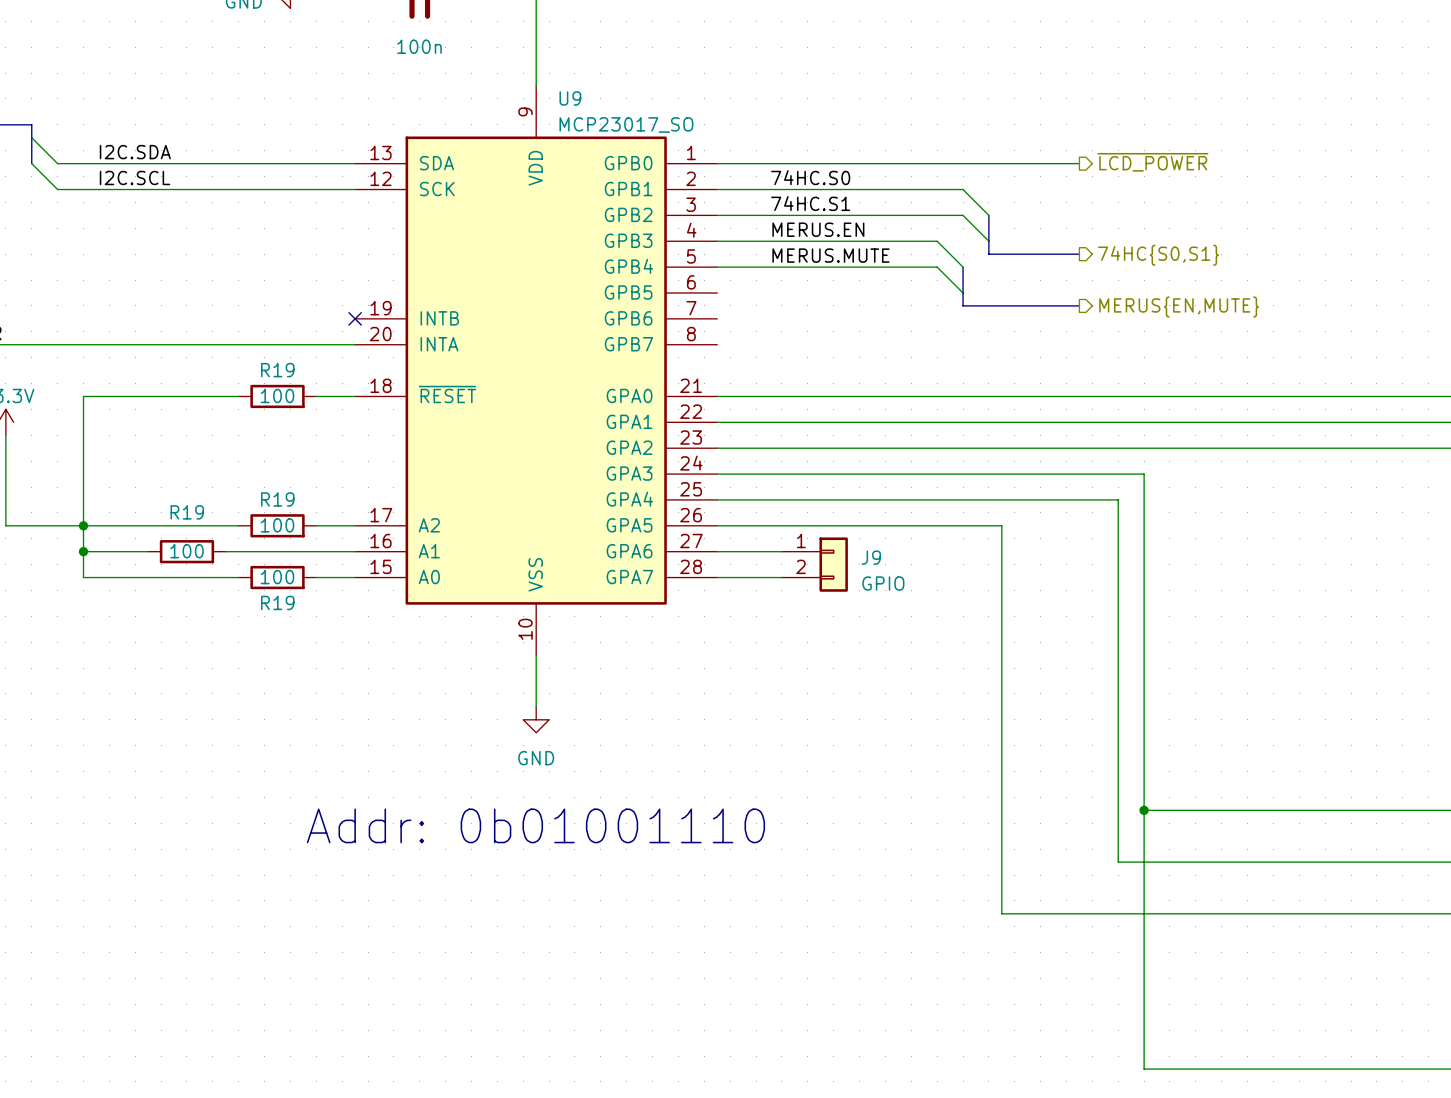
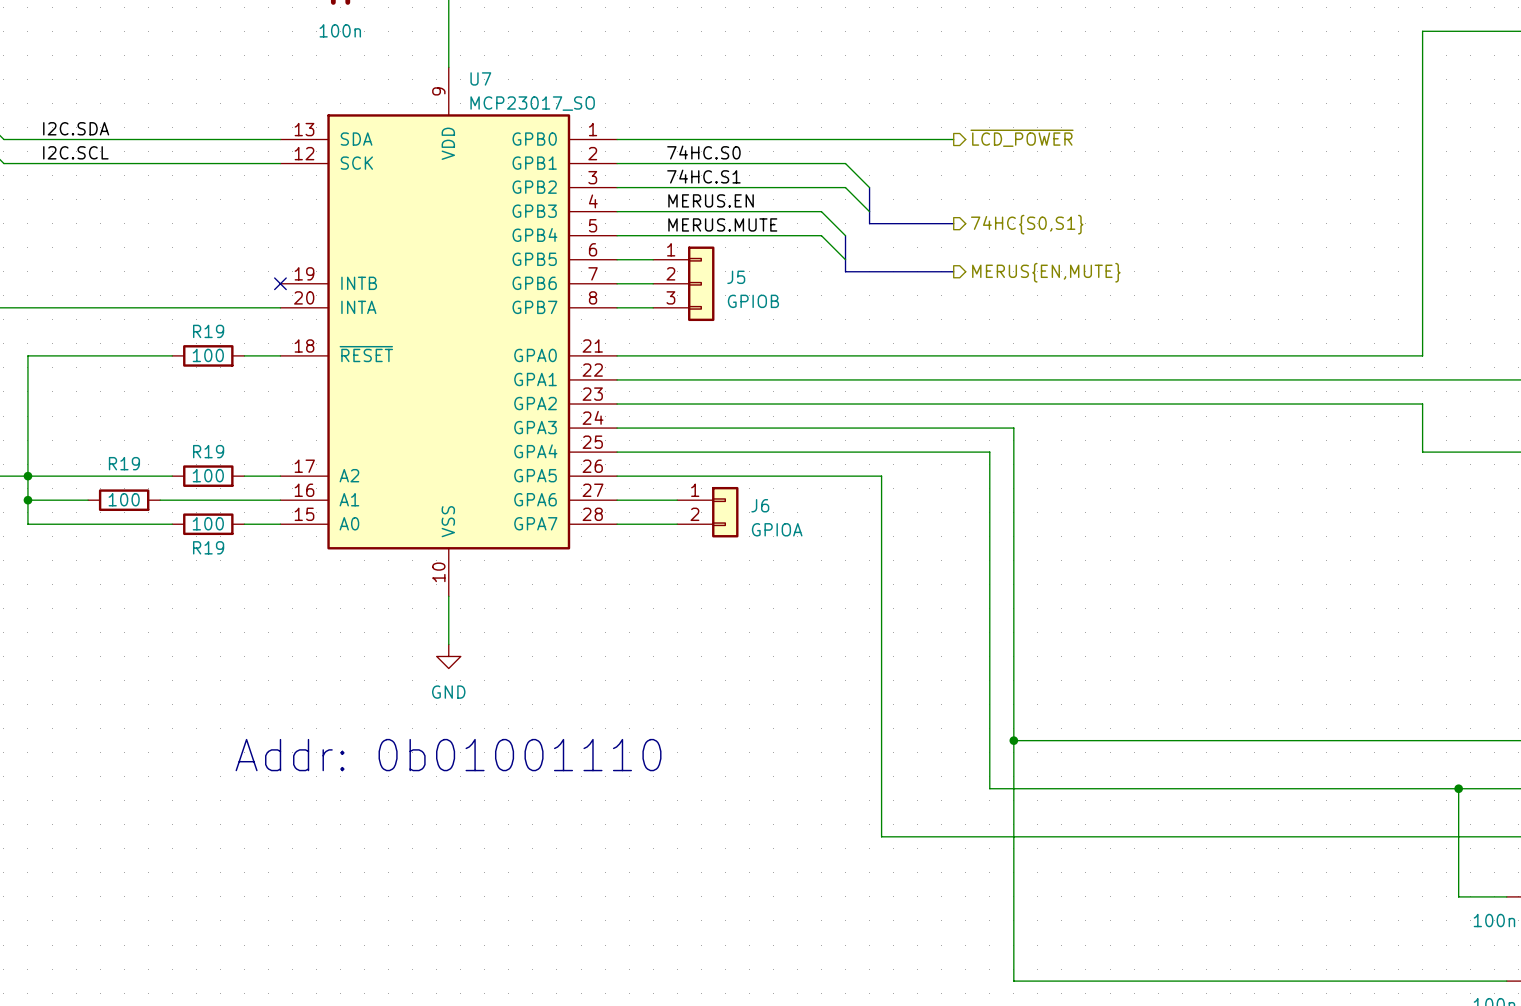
U9 name: U9 (570, 98) -> U7 (480, 78)
wire: none -> (617, 259) (653, 259)
wire: none -> (617, 283) (653, 283)
J5: none -> GPIOB (683, 283)
wire: none -> (617, 307) (653, 307)
J9 name: J9 (871, 557) -> J6 (760, 505)
J9 value: GPIO (883, 583) -> GPIOA (777, 529)

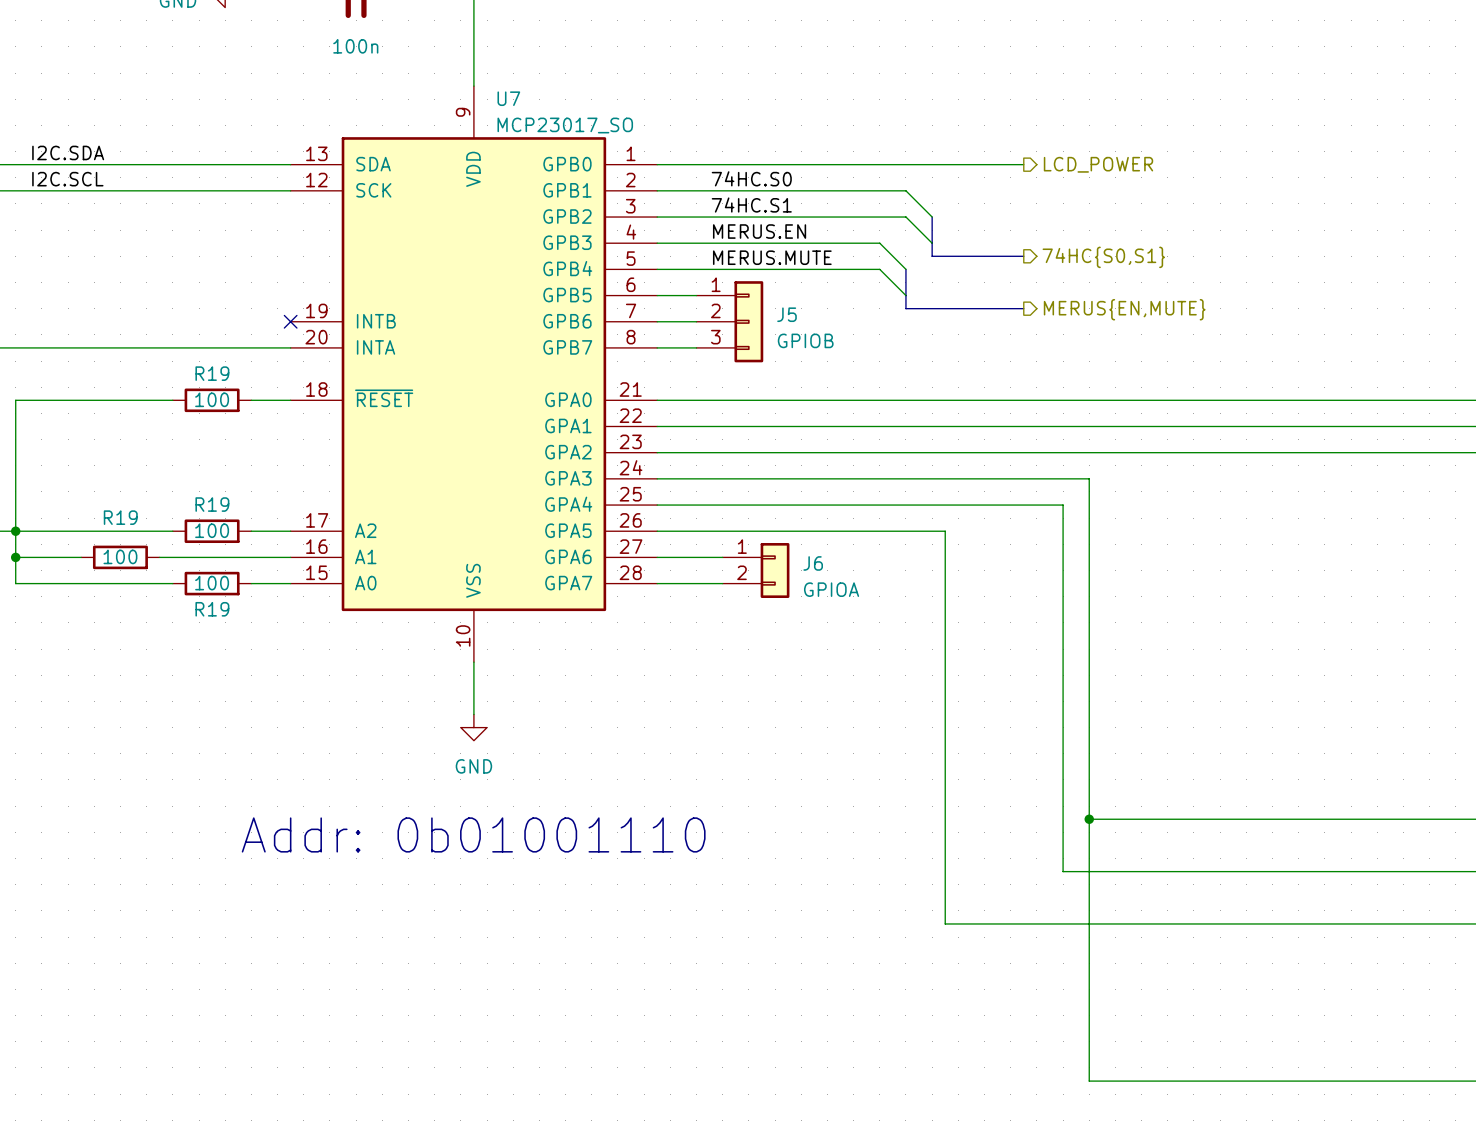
hierarchical label: ~{LCD_POWER} (1022, 138) -> LCD_POWER (1098, 164)

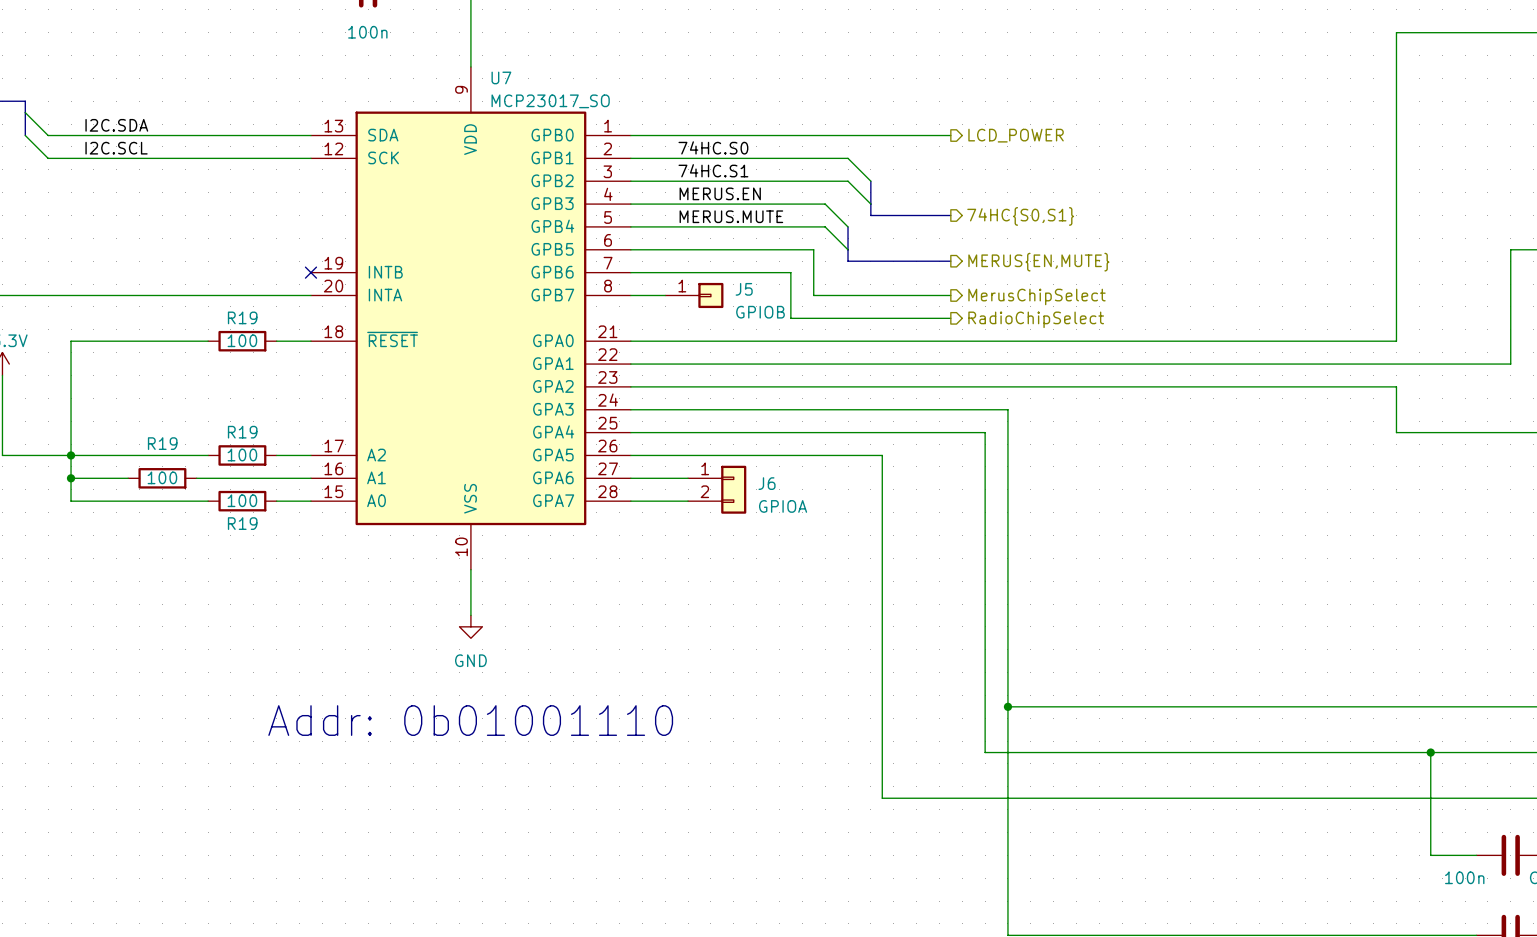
J5 symbol: [696, 281, 764, 363] -> [665, 282, 724, 309]
wire: none -> (665, 249) (813, 249) (813, 295) (950, 295)
wire: none -> (665, 272) (790, 272) (790, 318) (950, 318)
hierarchical label: none -> MerusChipSelect (1036, 296)
hierarchical label: none -> RadioChipSelect (1036, 319)

